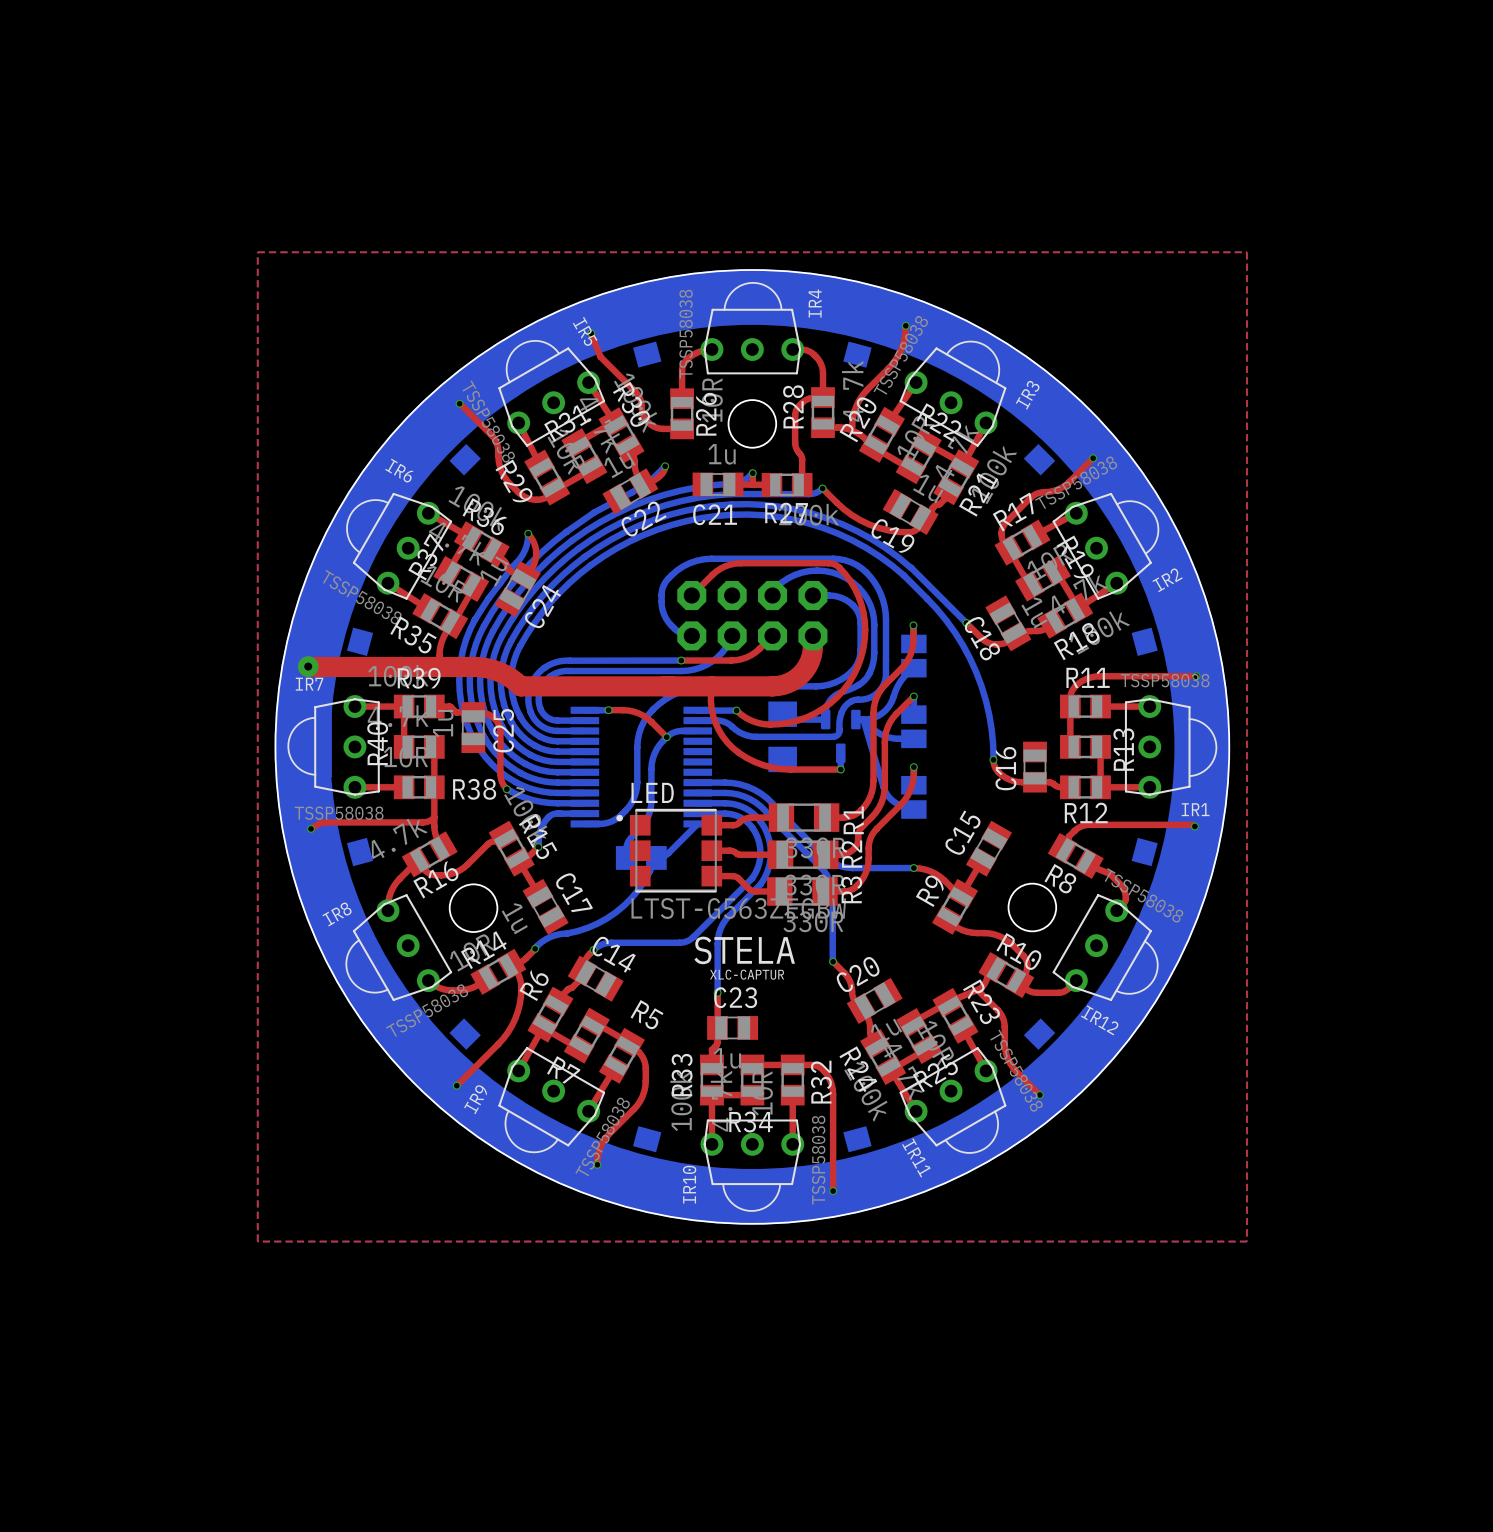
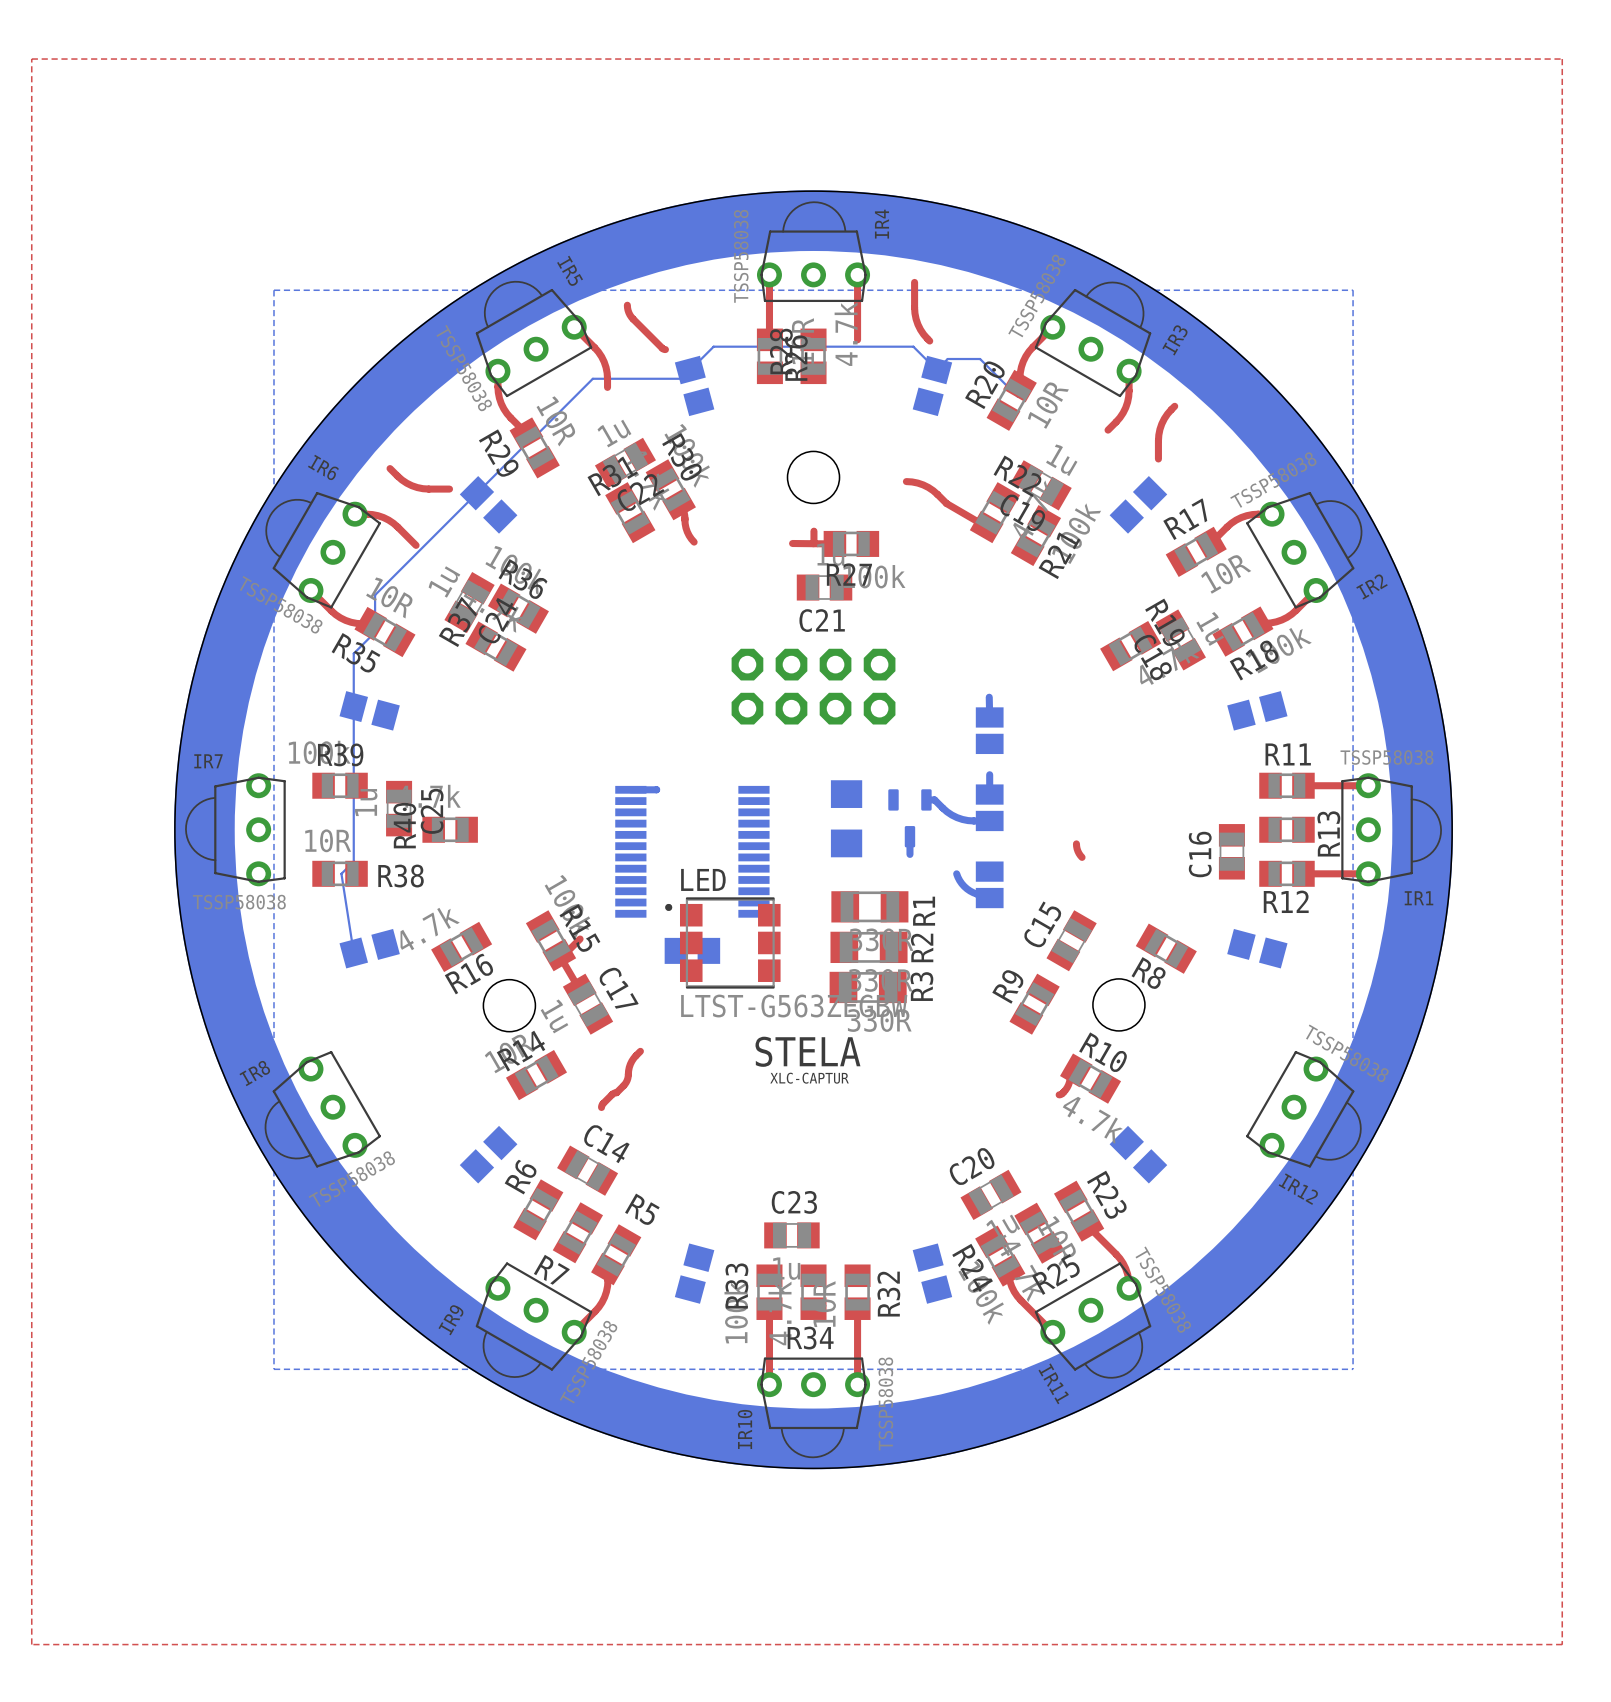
top zone outline: none -> (31, 59) (31, 1644) (1562, 1644) (1562, 59) (31, 59)
top track: none -> (769, 274) (769, 339)
top track: none -> (857, 274) (857, 339)
top track: none -> (914, 282) (916, 319) (920, 329) (929, 341)
top zone outline: (257, 252) (257, 1241) (1246, 1241) (1246, 252) (257, 252) -> none
top track: none -> (627, 305) (631, 317) (665, 349)
drawing shape: [274, 269, 1231, 1225] -> [174, 190, 1454, 1470]
round board edge size: [275, 269, 1230, 1225] -> [174, 190, 1453, 1469]
top track: none -> (574, 327) (601, 356) (607, 373) (607, 387)
top track: none -> (1052, 327) (1025, 356) (1020, 372) (1019, 386)
top track: (905, 325) (903, 341) (897, 356) (859, 400) (853, 413) (852, 426) (823, 427) -> none
via: (905, 325) -> none
top track: none -> (497, 371) (498, 392) (501, 403) (507, 413) (526, 433)
top track: none -> (1129, 371) (1128, 396) (1125, 407) (1119, 417) (1108, 430)
IR4 position: (752, 328) -> (813, 251)
top track: (591, 333) (600, 356) (638, 396) (643, 415) (648, 422) (658, 428) (682, 428) -> none
via: (591, 333) -> none
top track: (711, 349) (698, 352) (684, 363) (682, 370) (682, 398) -> none
top track: (792, 349) (803, 349) (812, 353) (819, 361) (822, 370) (823, 397) (805, 400) (798, 406) (795, 413) (795, 444) (802, 458) (802, 484) -> none
top track: none -> (1174, 406) (1164, 418) (1159, 429) (1158, 459)
top track: (588, 382) (613, 422) (576, 443) -> none
top track: (916, 382) (889, 421) -> none
IR5 position: (551, 393) -> (534, 339)
IR3 position: (952, 393) -> (1093, 339)
top track: (459, 403) (493, 437) (497, 445) (499, 466) (503, 475) (523, 496) (533, 499) (544, 498) (591, 469) -> none
via: (459, 403) -> none
R28 position: (823, 412) -> (813, 356)
R26 position: (682, 413) -> (769, 356)
top track: none -> (390, 468) (401, 479) (411, 485) (423, 488) (449, 489)
top track: (518, 422) (539, 464) -> none
top track: (986, 422) (963, 464) (926, 443) -> none
R20 position: (881, 434) -> (1011, 400)
top track: none -> (355, 514) (372, 514) (388, 520) (416, 545)
top track: none -> (1272, 514) (1252, 514) (1241, 517) (1231, 523) (1210, 543)
top track: (1093, 458) (1062, 487) (1032, 496) (1003, 525) (1001, 533) (1003, 541) (1030, 586) -> none
via: (1093, 458) -> none
bottom track: (665, 466) (651, 480) (594, 512) (542, 552) (520, 574) (500, 599) (484, 626) (473, 652) (470, 671) (471, 700) (479, 728) (493, 750) (513, 768) (532, 778) (551, 782) (584, 782) -> none
top track: (665, 466) (663, 471) (657, 478) (643, 483) -> none
via: (665, 466) -> none
bottom track: (752, 473) (737, 482) (696, 487) (663, 495) (631, 506) (600, 521) (572, 540) (538, 570) (509, 605) (493, 631) (484, 650) (480, 681) (484, 712) (497, 738) (512, 755) (533, 767) (549, 771) (584, 772) -> none
via: (752, 473) -> none
R29 position: (547, 477) -> (534, 447)
C21 position: (718, 484) -> (824, 587)
bottom track: (822, 488) (809, 494) (714, 495) (682, 500) (650, 510) (620, 522) (592, 539) (567, 557) (535, 588) (509, 623) (494, 653) (490, 681) (494, 709) (502, 726) (509, 737) (530, 754) (550, 761) (584, 761) -> none
top track: (822, 488) (844, 509) (860, 520) (888, 530) (908, 532) (915, 530) (921, 524) (932, 508) (946, 497) (948, 490) -> none
via: (822, 488) -> none
C22 position: (630, 491) -> (625, 462)
C19 position: (910, 511) -> (1041, 485)
top track: (428, 513) (468, 536) (448, 571) -> none
top track: (1076, 513) (1035, 535) -> none
top track: none -> (310, 590) (340, 617) (356, 623) (370, 623)
top track: none -> (1316, 590) (1286, 617) (1270, 622) (1257, 623)
bottom track: (528, 533) (522, 554) (488, 598) (474, 619) (466, 638) (459, 670) (459, 691) (463, 712) (470, 732) (480, 749) (492, 764) (507, 777) (521, 785) (543, 791) (584, 792) -> none
top track: (528, 533) (535, 546) (536, 557) (532, 567) (525, 575) (510, 570) (494, 551) -> none
via: (528, 533) -> none
R17 position: (1022, 542) -> (1196, 551)
IR6 position: (399, 546) -> (323, 550)
IR2 position: (1105, 546) -> (1304, 550)
top track: (1056, 571) (1078, 608) (1116, 583) -> none
top track: (388, 583) (427, 608) -> none
top track: (474, 586) (442, 638) (439, 650) (439, 666) -> none
C24 position: (517, 589) -> (469, 602)
top track: (691, 595) (716, 571) (730, 564) (828, 563) (839, 567) (850, 581) (858, 596) (864, 621) (863, 648) (854, 674) (837, 696) (823, 708) (806, 717) (779, 724) (758, 722) (746, 718) (736, 710) -> none
bottom track: (772, 595) (775, 587) (794, 574) (817, 570) (832, 572) (846, 578) (858, 587) (870, 604) (873, 618) (874, 658) (871, 668) (865, 679) (854, 687) (832, 697) (826, 707) (825, 719) (782, 719) (782, 714) -> none
bottom track: (812, 595) (833, 595) (842, 598) (849, 602) (857, 610) (860, 619) (860, 653) (858, 661) (851, 671) (841, 679) (822, 685) (701, 686) (686, 689) (671, 695) (652, 709) (641, 726) (637, 740) (636, 787) (628, 806) (611, 821) (584, 823) -> none
R18 position: (1065, 615) -> (1242, 631)
R35 position: (440, 616) -> (384, 632)
bottom track: (966, 622) (898, 557) (857, 531) (827, 518) (780, 506) (747, 504) (700, 507) (654, 519) (611, 539) (584, 556) (563, 574) (543, 594) (526, 617) (511, 640) (504, 656) (500, 681) (502, 698) (507, 714) (517, 731) (530, 742) (546, 750) (584, 751) -> none
top track: (966, 622) (983, 640) (990, 643) (1003, 643) (1015, 636) (1022, 636) -> none
via: (966, 622) -> none
C18 position: (1008, 623) -> (1180, 639)
top track: (1052, 623) (1043, 629) (1026, 631) (1018, 636) -> none
top track: (913, 625) (913, 645) (908, 659) (881, 688) (874, 702) (873, 780) (870, 796) (864, 805) (856, 814) (846, 817) (827, 818) -> none
via: (913, 625) -> none
bottom track: (691, 635) (679, 632) (668, 622) (662, 610) (661, 592) (666, 580) (677, 570) (689, 563) (704, 559) (845, 560) (861, 568) (870, 577) (880, 594) (885, 613) (885, 675) (883, 684) (873, 695) (853, 700) (845, 705) (840, 716) (839, 731) (836, 736) (752, 736) (739, 732) (722, 721) (697, 720) -> none
bottom track: (732, 635) (726, 647) (717, 657) (706, 664) (694, 669) (566, 670) (556, 673) (548, 678) (542, 685) (538, 696) (539, 705) (543, 714) (555, 720) (584, 720) -> none
top track: (772, 635) (755, 652) (741, 659) (681, 660) -> none
top track: (812, 635) (811, 656) (804, 670) (788, 683) (772, 686) (520, 686) (499, 672) (480, 667) (308, 666) -> none
bottom track: (681, 660) (565, 660) (556, 662) (544, 667) (533, 680) (529, 691) (528, 704) (533, 718) (541, 725) (550, 730) (584, 730) -> none
via: (681, 660) -> none
via: (308, 666) -> none
bottom track: (913, 668) (901, 680) (885, 710) (875, 717) (863, 719) (883, 787) -> none
top track: (1196, 676) (1099, 676) (1082, 680) (1073, 688) (1070, 696) (1070, 746) -> none
via: (1196, 676) -> none
top track: (711, 686) (711, 708) (718, 730) (732, 747) (746, 757) (763, 765) (781, 769) (840, 769) -> none
top track: (913, 696) (893, 717) (886, 731) (884, 791) (878, 808) (860, 829) (857, 842) (854, 848) (845, 854) (825, 854) -> none
via: (913, 696) -> none
top track: (354, 706) (404, 706) (404, 746) -> none
R39 position: (419, 706) -> (340, 785)
top track: (434, 706) (450, 706) (456, 712) (485, 713) (496, 720) (500, 730) (500, 776) (506, 789) -> none
R11 position: (1085, 706) -> (1286, 785)
top track: (1100, 706) (1149, 706) -> none
top track: none -> (1303, 785) (1368, 785)
top track: (608, 710) (628, 710) (638, 713) (647, 718) (666, 737) -> none
via: (608, 710) -> none
bottom track: (697, 710) (736, 710) -> none
via: (736, 710) -> none
C25 position: (473, 727) -> (399, 808)
bottom track: (697, 730) (673, 732) (666, 737) (656, 749) (651, 764) (650, 811) (643, 825) (628, 841) (626, 857) -> none
via: (666, 737) -> none
bottom track: (584, 741) (557, 741) (544, 738) (528, 728) (516, 710) (511, 688) (512, 666) (520, 645) (534, 623) (551, 601) (580, 573) (603, 556) (629, 541) (657, 529) (686, 520) (716, 515) (747, 514) (778, 517) (823, 528) (866, 547) (903, 575) (946, 620) (970, 658) (981, 686) (989, 714) (993, 759) -> none
IR7 position: (333, 746) -> (235, 829)
top track: (434, 746) (434, 830) (442, 846) -> none
R13 position: (1085, 746) -> (1286, 829)
top track: (1100, 746) (1100, 787) (1149, 787) -> none
IR1 position: (1171, 746) -> (1391, 829)
via: (993, 759) -> none
top track: (913, 767) (912, 784) (907, 795) (870, 837) (867, 868) (860, 881) (848, 890) (825, 891) -> none
via: (913, 767) -> none
C16 position: (1035, 767) -> (1231, 851)
via: (840, 769) -> none
top track: (998, 772) (1013, 781) (1049, 782) (1058, 786) (1070, 787) -> none
bottom track: (697, 782) (732, 783) (754, 789) (767, 798) (824, 856) (837, 864) (852, 868) (913, 868) -> none
top track: (354, 787) (404, 787) -> none
R38 position: (419, 787) -> (340, 873)
R12 position: (1085, 787) -> (1286, 873)
top track: none -> (1303, 873) (1368, 873)
bottom track: (506, 789) (541, 801) (584, 803) -> none
via: (506, 789) -> none
bottom track: (697, 792) (731, 793) (743, 796) (755, 802) (824, 871) (832, 890) (833, 961) -> none
bottom track: (697, 803) (730, 803) (749, 810) (764, 827) (770, 846) (769, 866) (764, 878) (725, 919) (720, 928) (717, 944) (717, 992) -> none
bottom track: (584, 813) (555, 813) (549, 816) (541, 827) (538, 847) -> none
bottom track: (697, 813) (732, 814) (749, 824) (757, 837) (760, 852) (757, 868) (752, 878) (687, 941) (607, 942) (593, 950) -> none
top track: (434, 817) (422, 822) (324, 822) (311, 828) -> none
top track: (781, 817) (749, 817) (735, 824) (711, 825) -> none
bottom track: (697, 823) (667, 854) (656, 857) (638, 890) (615, 912) (587, 927) (550, 936) (535, 948) -> none
top track: (1194, 826) (1193, 824) (1086, 825) (1074, 831) (1068, 836) (1066, 843) (1062, 848) -> none
via: (1194, 826) -> none
via: (311, 828) -> none
top track: (504, 835) (488, 843) (464, 867) (451, 874) (430, 874) (416, 861) (393, 887) (389, 896) (388, 910) -> none
via: (538, 847) -> none
top track: (711, 850) (731, 850) (739, 854) (780, 854) -> none
top track: (981, 861) (962, 893) (952, 888) (935, 873) (913, 868) -> none
top track: (1095, 866) (1088, 863) (1109, 873) (1124, 890) (1125, 901) (1116, 910) -> none
via: (913, 868) -> none
top track: (711, 876) (735, 876) (753, 891) (779, 891) -> none
top track: (950, 919) (947, 919) (961, 929) (994, 934) (1012, 944) (1026, 961) (1026, 971) (1020, 981) -> none
IR8 position: (398, 947) -> (322, 1109)
IR12 position: (1105, 947) -> (1303, 1109)
top track: (535, 948) (521, 961) (511, 964) (518, 975) (521, 988) (519, 1003) (512, 1025) (498, 1044) (456, 1085) -> none
via: (535, 948) -> none
via: (593, 950) -> none
top track: (833, 961) (848, 978) (853, 998) (868, 1018) (870, 1036) (875, 1043) -> none
via: (833, 961) -> none
top track: (1024, 977) (1019, 982) (1028, 990) (1037, 992) (1061, 992) (1076, 980) -> none
C14 position: (595, 978) -> (587, 1170)
top track: (485, 979) (473, 987) (458, 990) (443, 989) (428, 980) -> none
top track: (717, 992) (717, 1043) (711, 1049) (711, 1064) -> none
via: (717, 992) -> none
C20 position: (874, 1000) -> (991, 1194)
R10 value: none -> 4.7k (1092, 1120)
R6 position: (550, 1014) -> (538, 1209)
R23 position: (955, 1015) -> (1079, 1211)
top track: (594, 1022) (629, 1042) (642, 1056) (645, 1068) (645, 1085) (640, 1100) (605, 1137) (598, 1152) (597, 1164) -> none
top track: (911, 1022) (951, 1000) (977, 989) (1002, 1017) (1005, 1048) (1010, 1063) (1039, 1094) -> none
C23 position: (732, 1027) -> (791, 1235)
top track: (963, 1028) (986, 1070) -> none
R7 position: (586, 1035) -> (577, 1232)
R25 position: (919, 1036) -> (1039, 1233)
top track: (579, 1048) (542, 1027) (518, 1070) -> none
top track: (926, 1049) (890, 1070) (916, 1111) -> none
R5 position: (621, 1055) -> (616, 1254)
R24 position: (883, 1057) -> (1000, 1256)
top track: (752, 1064) (813, 1065) (821, 1068) (828, 1077) (833, 1094) (833, 1191) -> none
top track: (614, 1068) (588, 1111) -> none
R33 position: (711, 1080) -> (769, 1292)
R34 position: (752, 1080) -> (813, 1292)
R32 position: (792, 1080) -> (857, 1292)
via: (456, 1085) -> none
via: (1039, 1094) -> none
top track: (752, 1095) (711, 1095) (711, 1144) -> none
top track: (792, 1095) (792, 1144) -> none
IR9 position: (551, 1100) -> (534, 1320)
IR11 position: (952, 1100) -> (1093, 1320)
top track: none -> (1087, 1225) (1123, 1263) (1127, 1274) (1129, 1288)
top track: none -> (607, 1269) (607, 1286) (602, 1302) (574, 1332)
top track: none -> (1008, 1270) (1011, 1286) (1017, 1296) (1052, 1332)
via: (597, 1164) -> none
IR10 position: (752, 1165) -> (813, 1407)
top track: none -> (769, 1308) (769, 1384)
top track: none -> (857, 1308) (857, 1384)
via: (833, 1191) -> none

